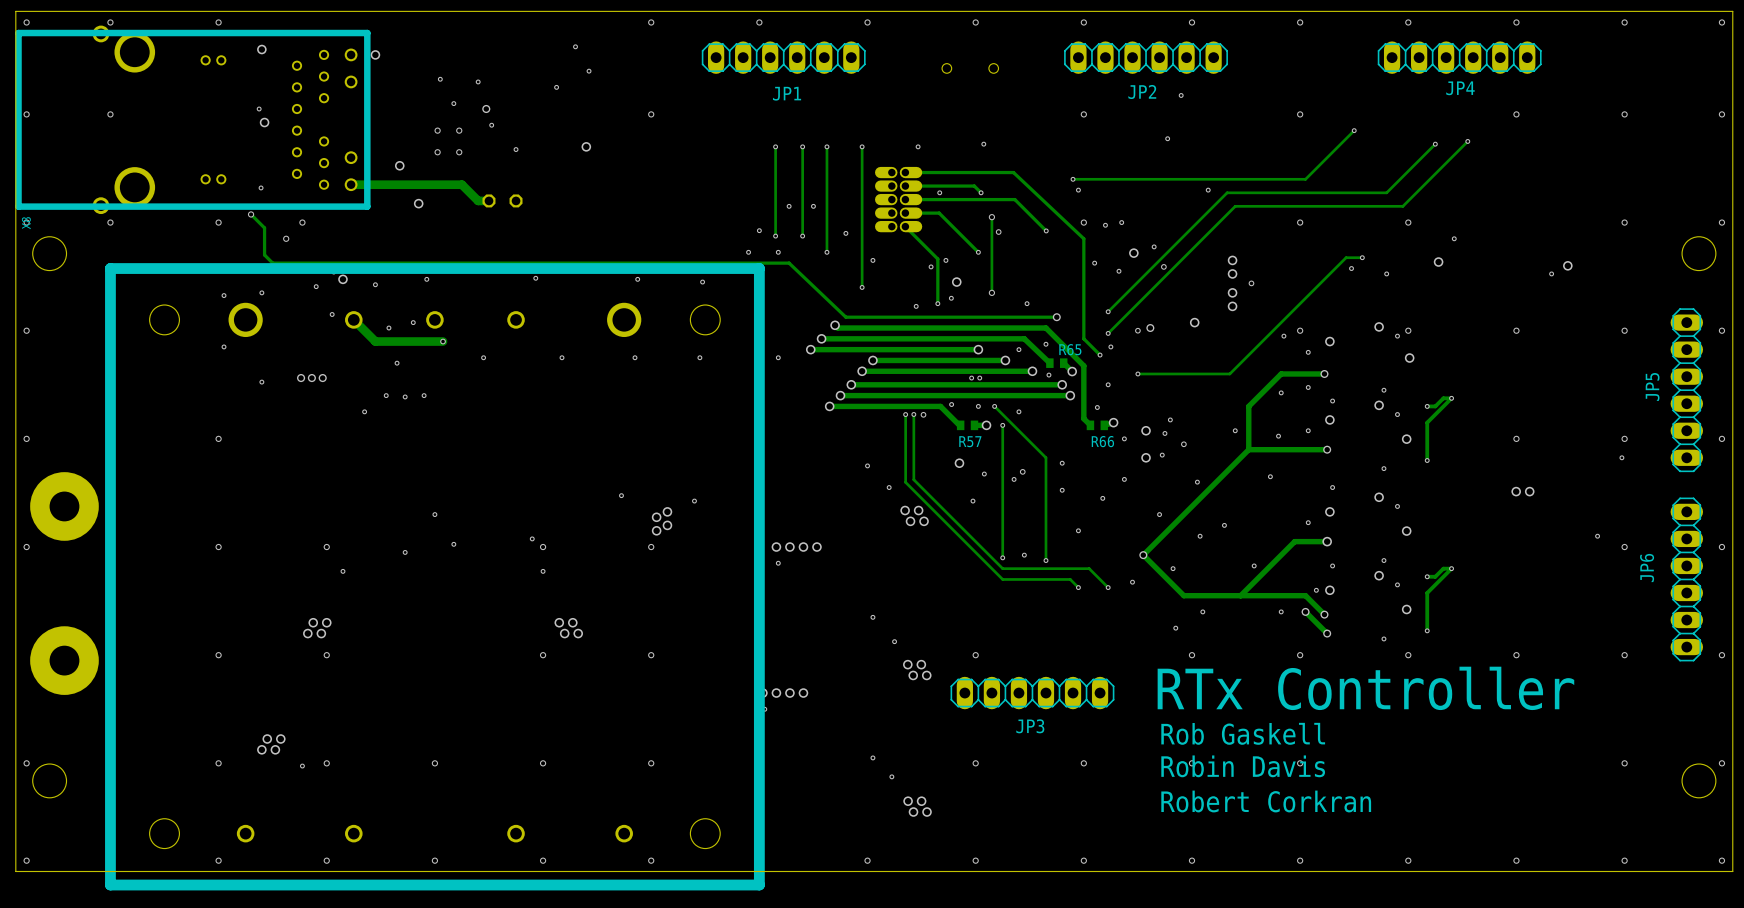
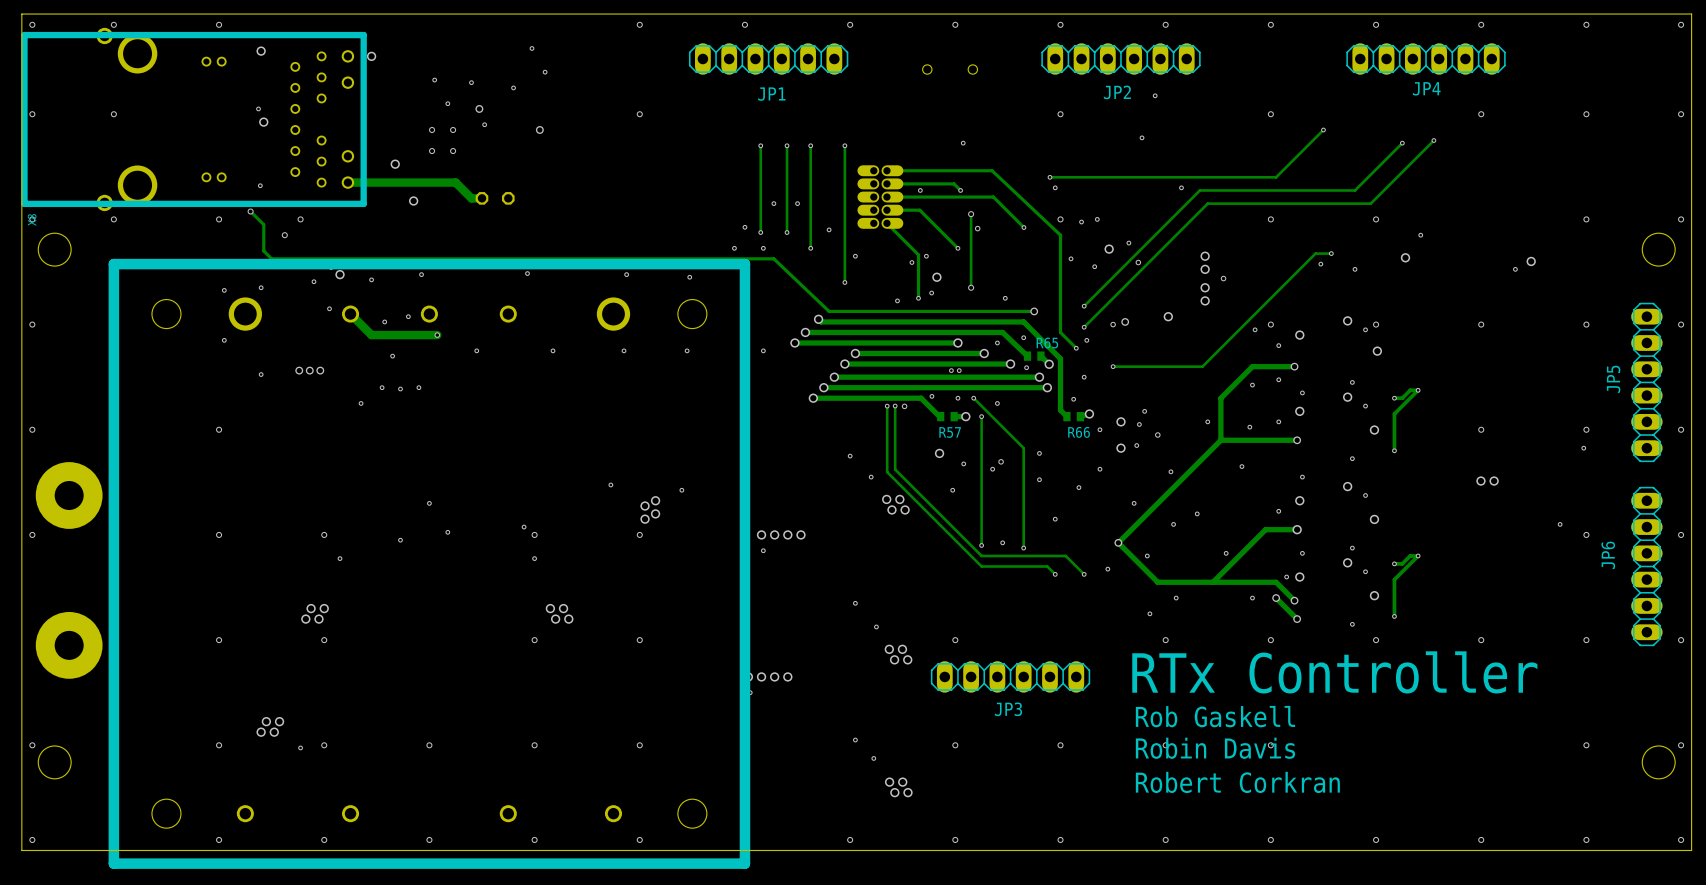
via: none -> (531, 48)
via: (575, 46) -> none
via: none -> (545, 72)
via: (589, 71) -> none
via: none -> (513, 87)
via: (556, 87) -> none
via: none -> (539, 129)
via: (586, 146) -> none
via: (918, 146) -> none
via: (516, 149) -> none

